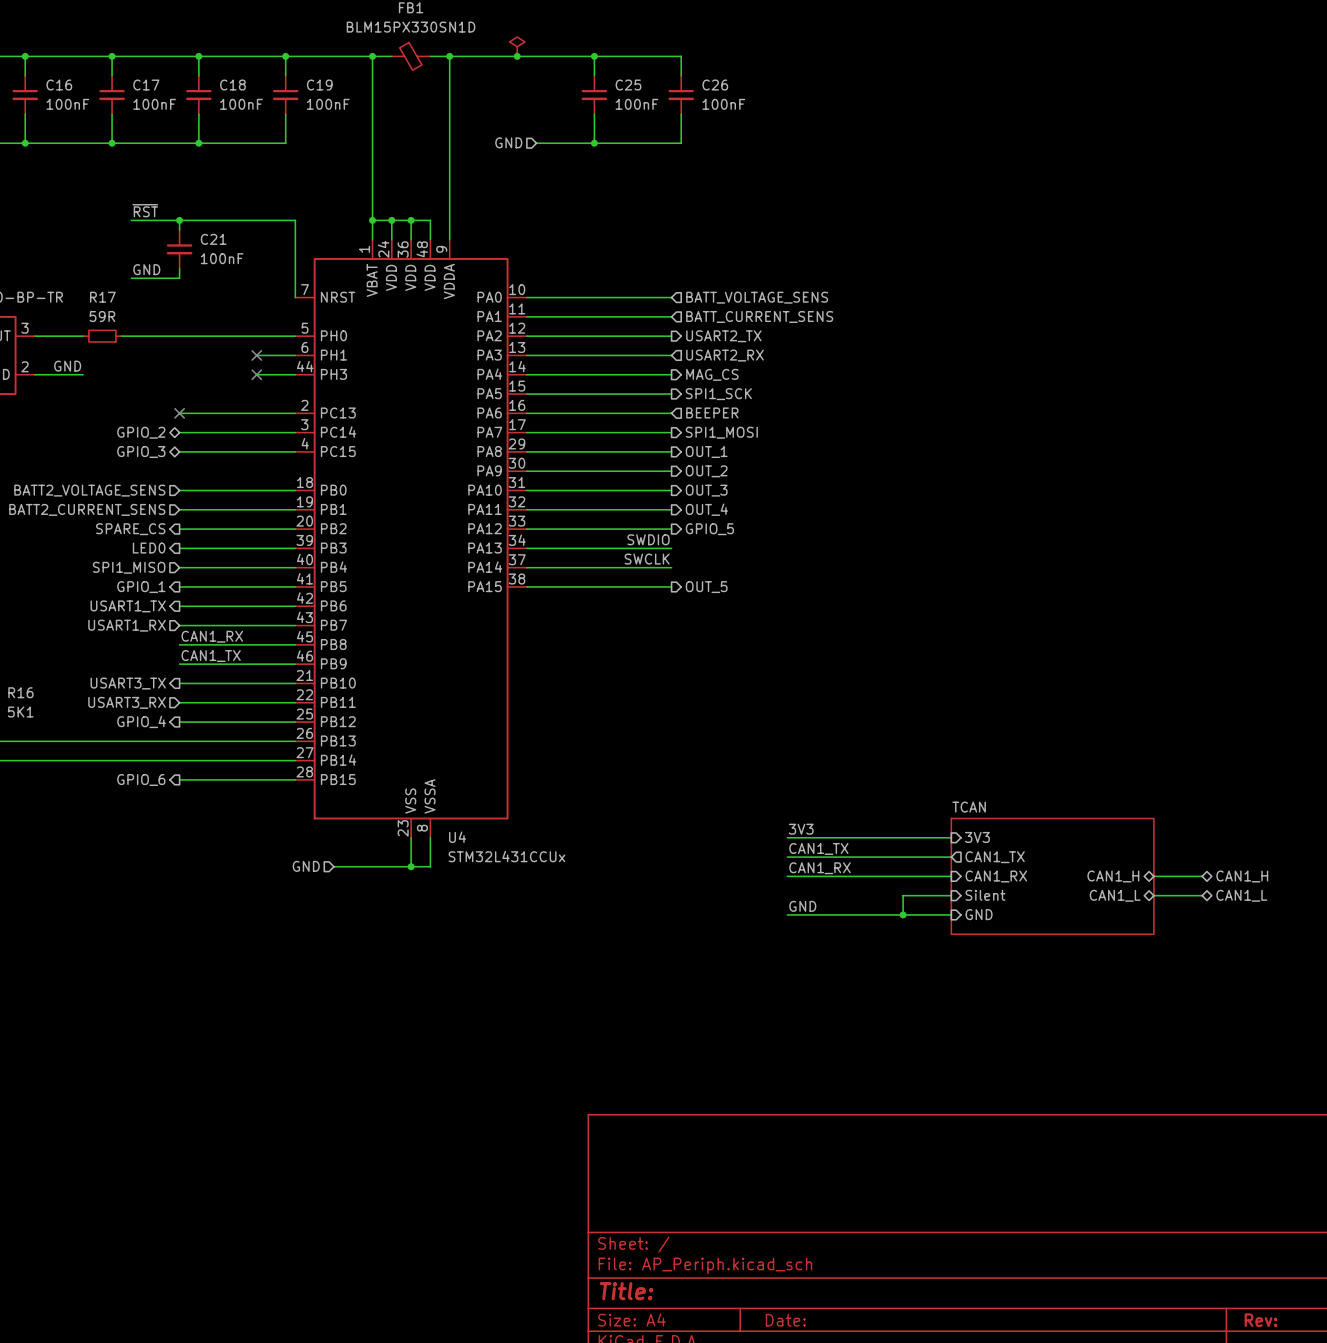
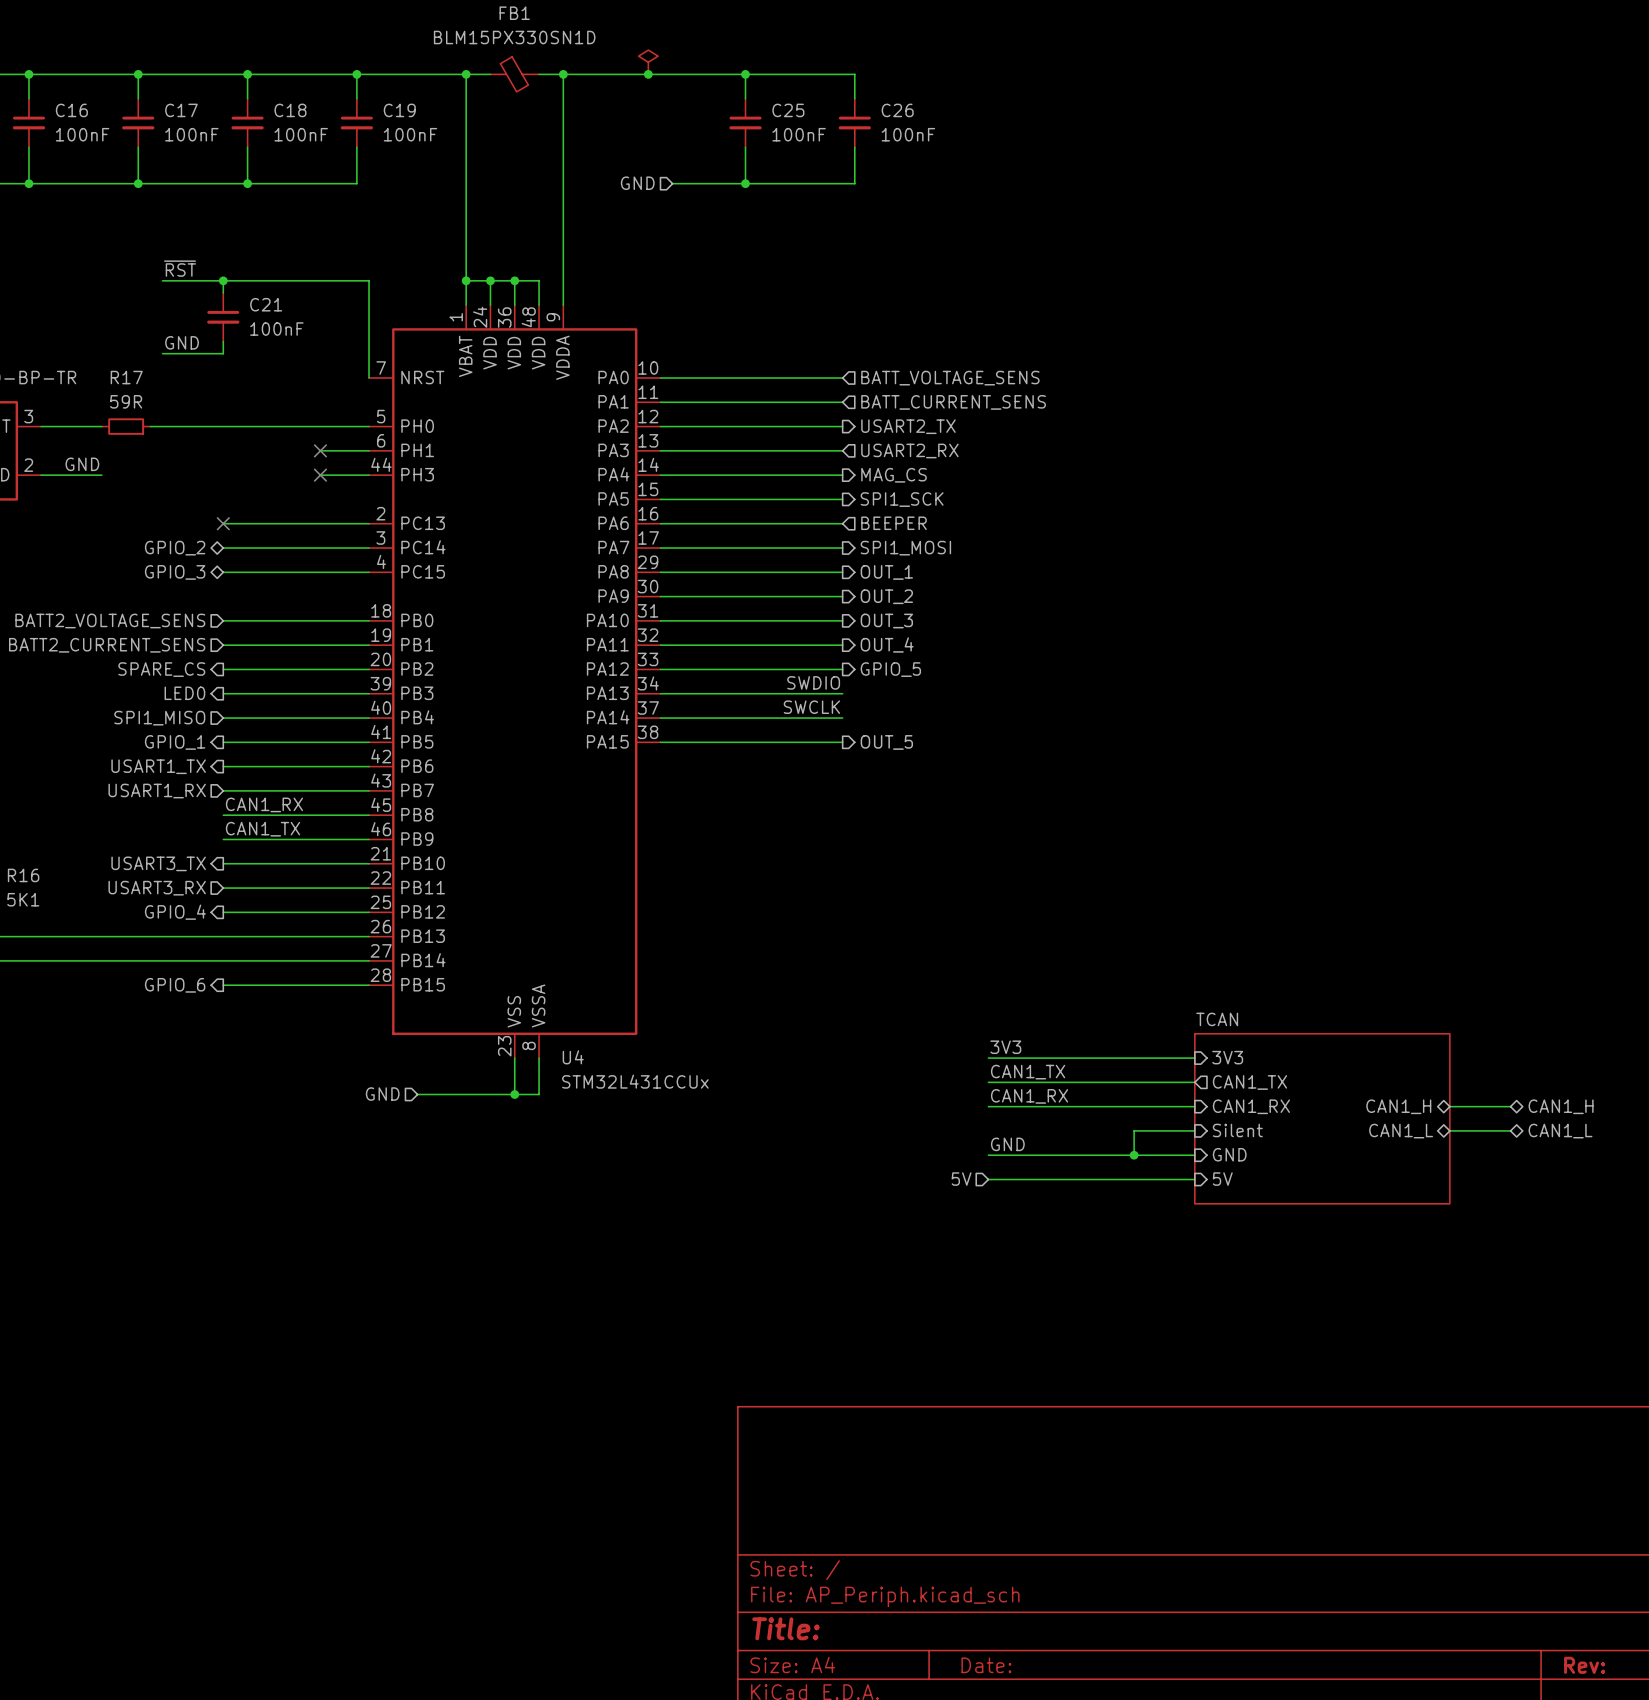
sheet TCAN: (1052, 876) -> none
sheet TCAN: none -> (1322, 1118)
hierarchical label: none -> 5V (961, 1179)
sheet pin: none -> 5V (1222, 1179)
wire: none -> (988, 1179) (1194, 1179)

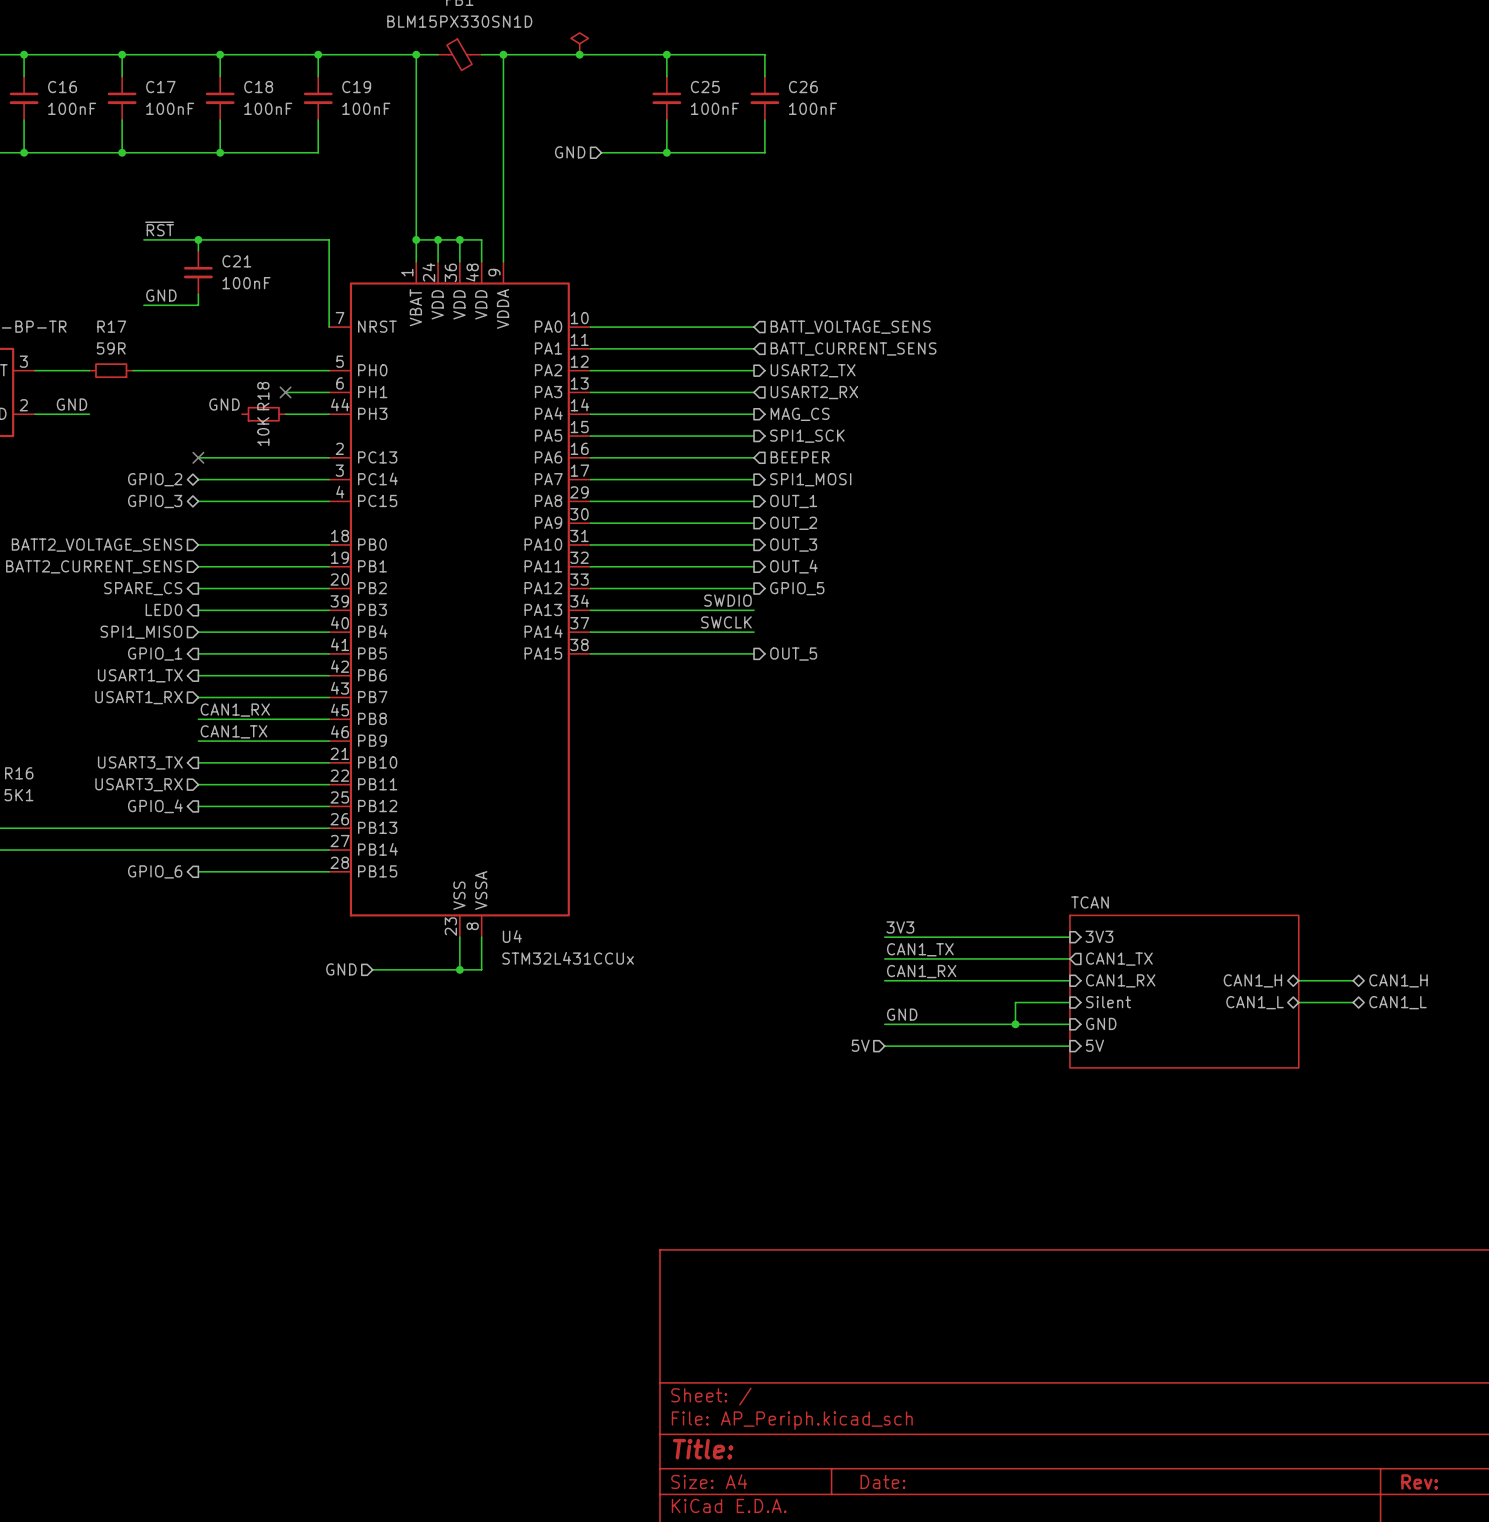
label: none -> GND (224, 404)
R18: none -> 10K (263, 414)
no-connect mark: (320, 475) -> none

